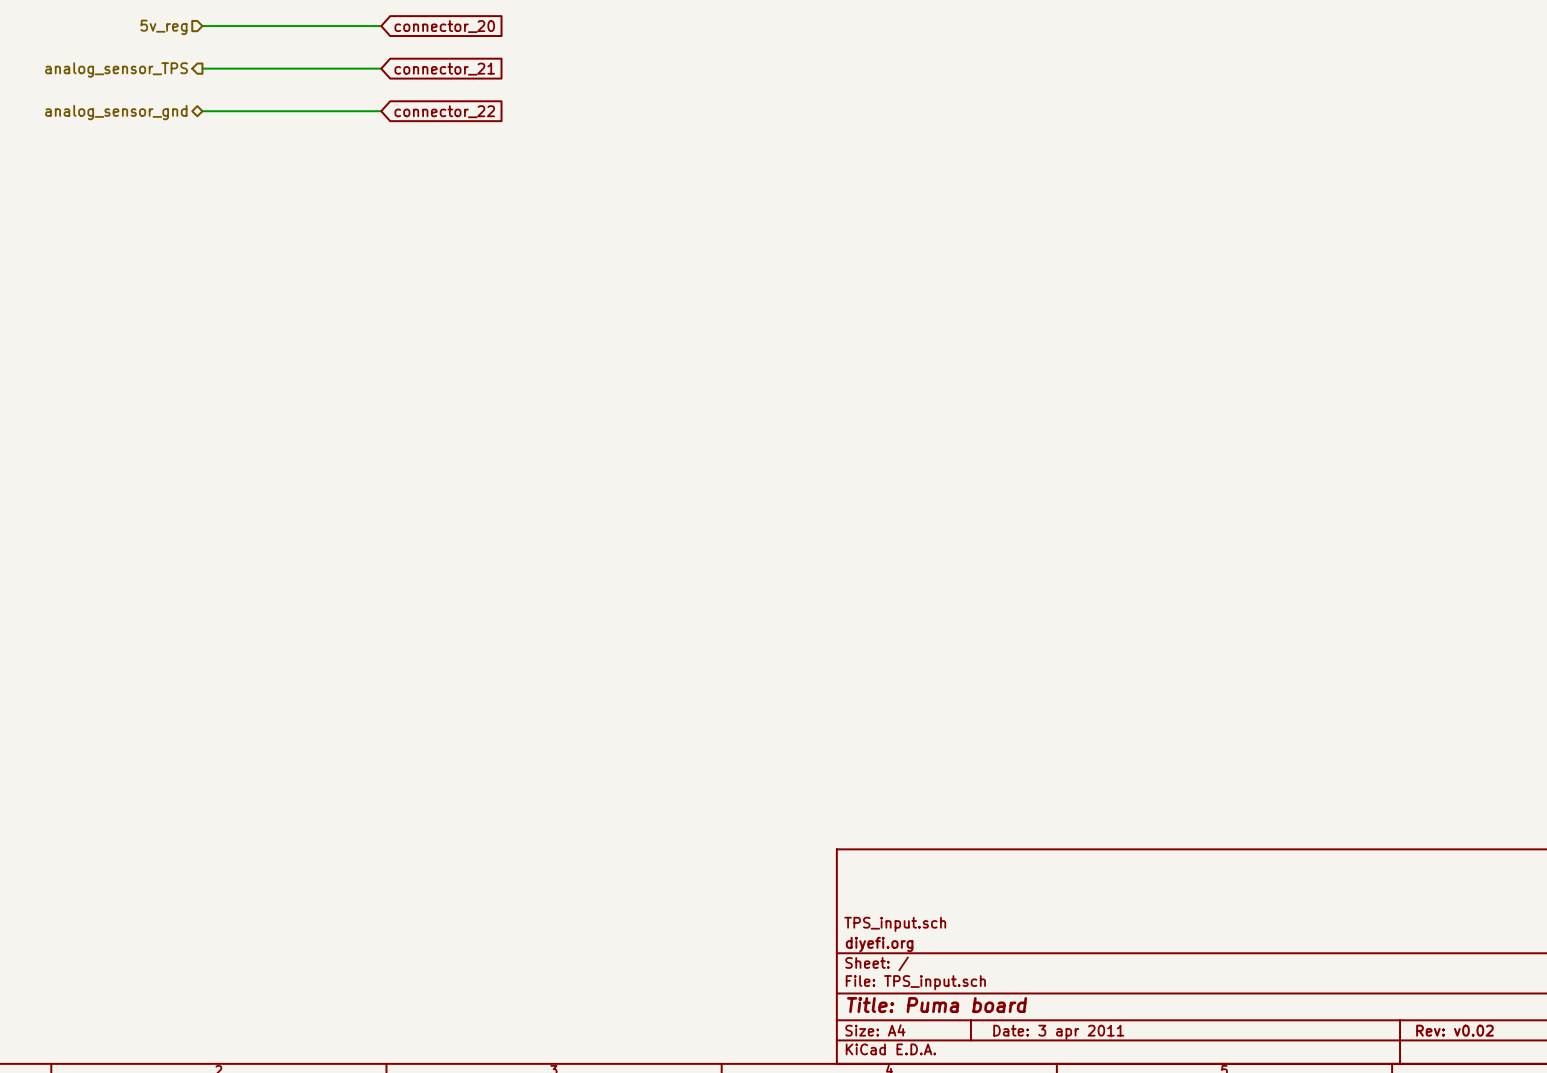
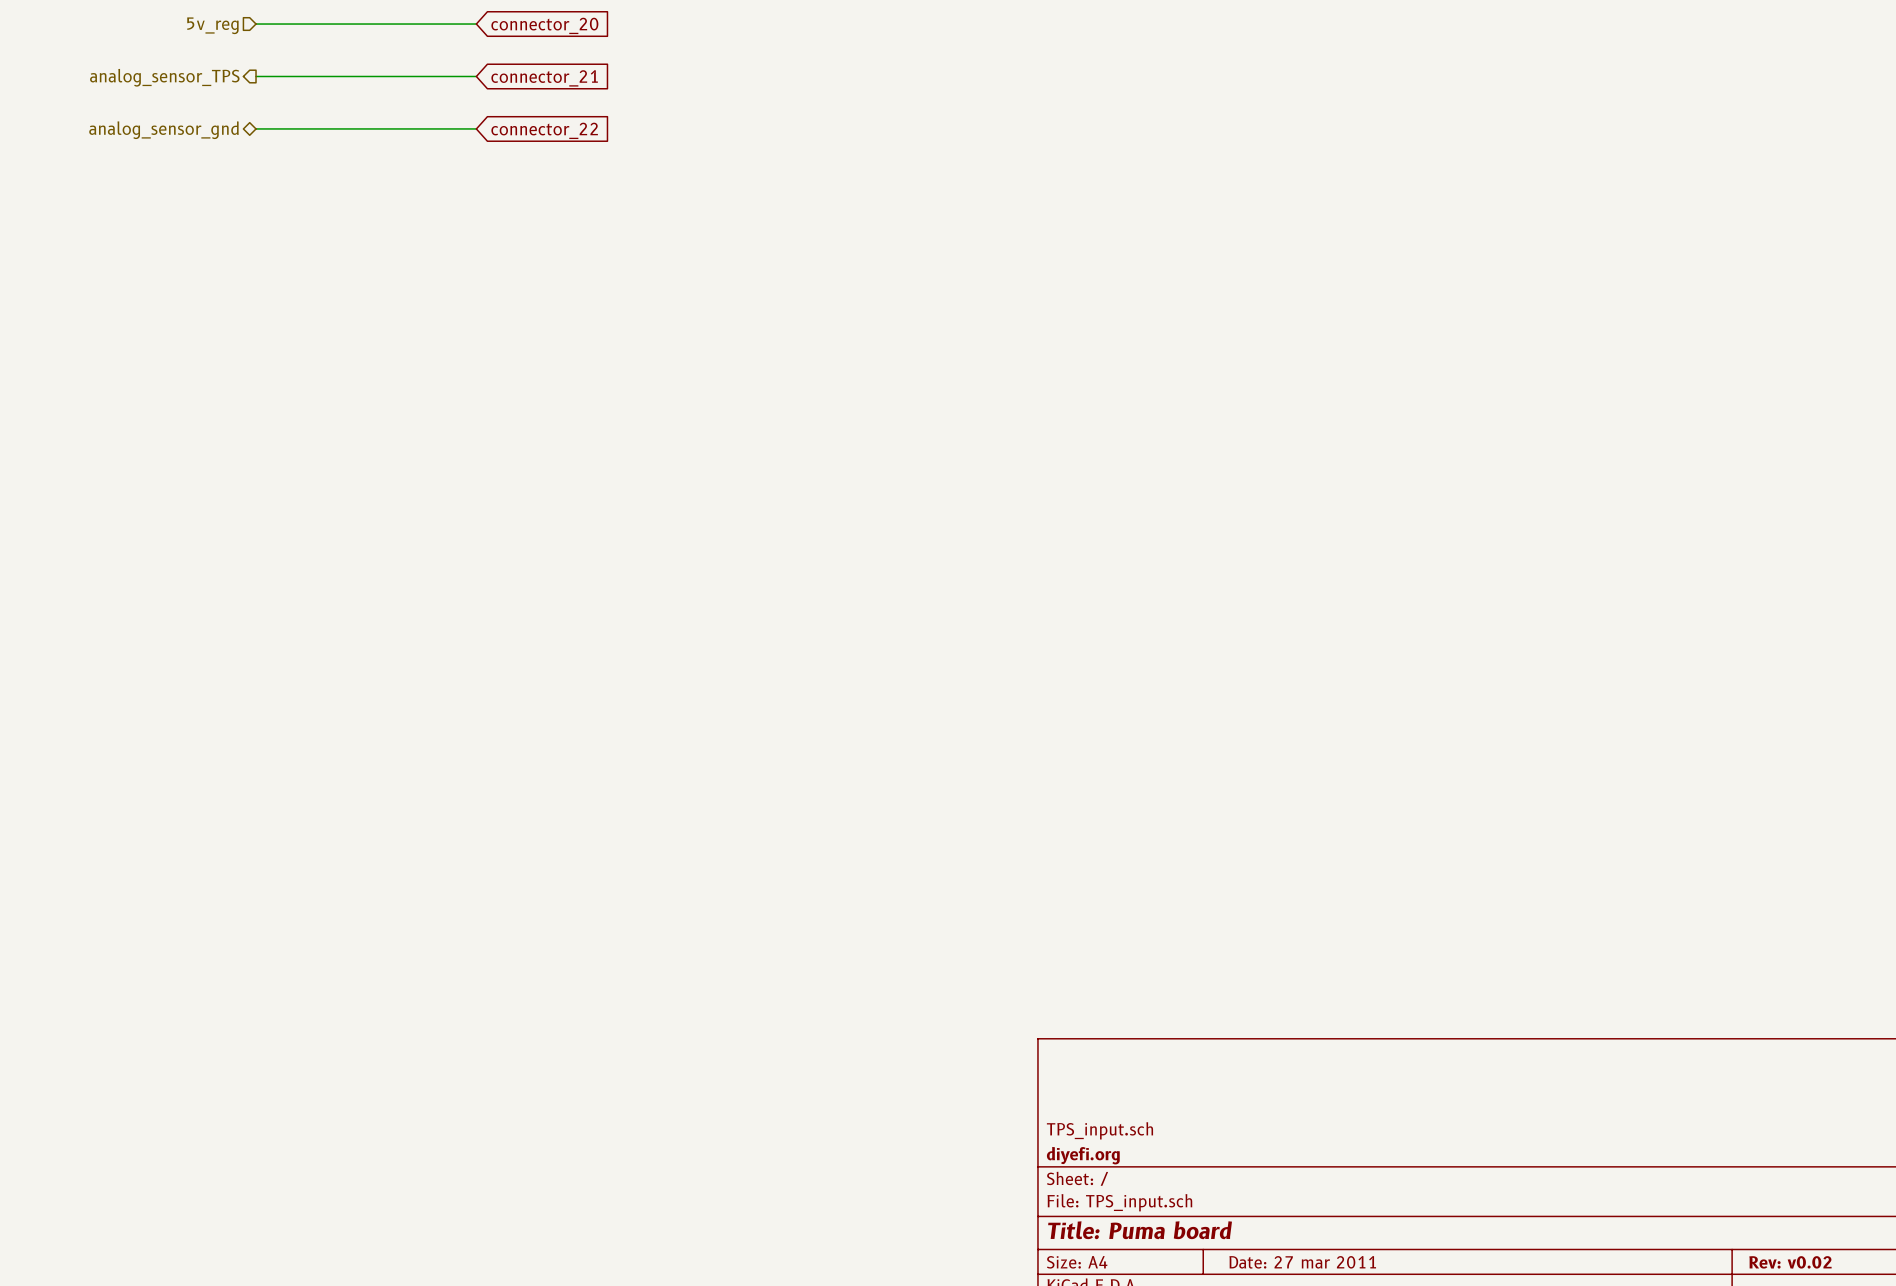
title block: Date: 3 apr 2011 (1058, 1032) -> Date: 27 mar 2011 (1302, 1262)

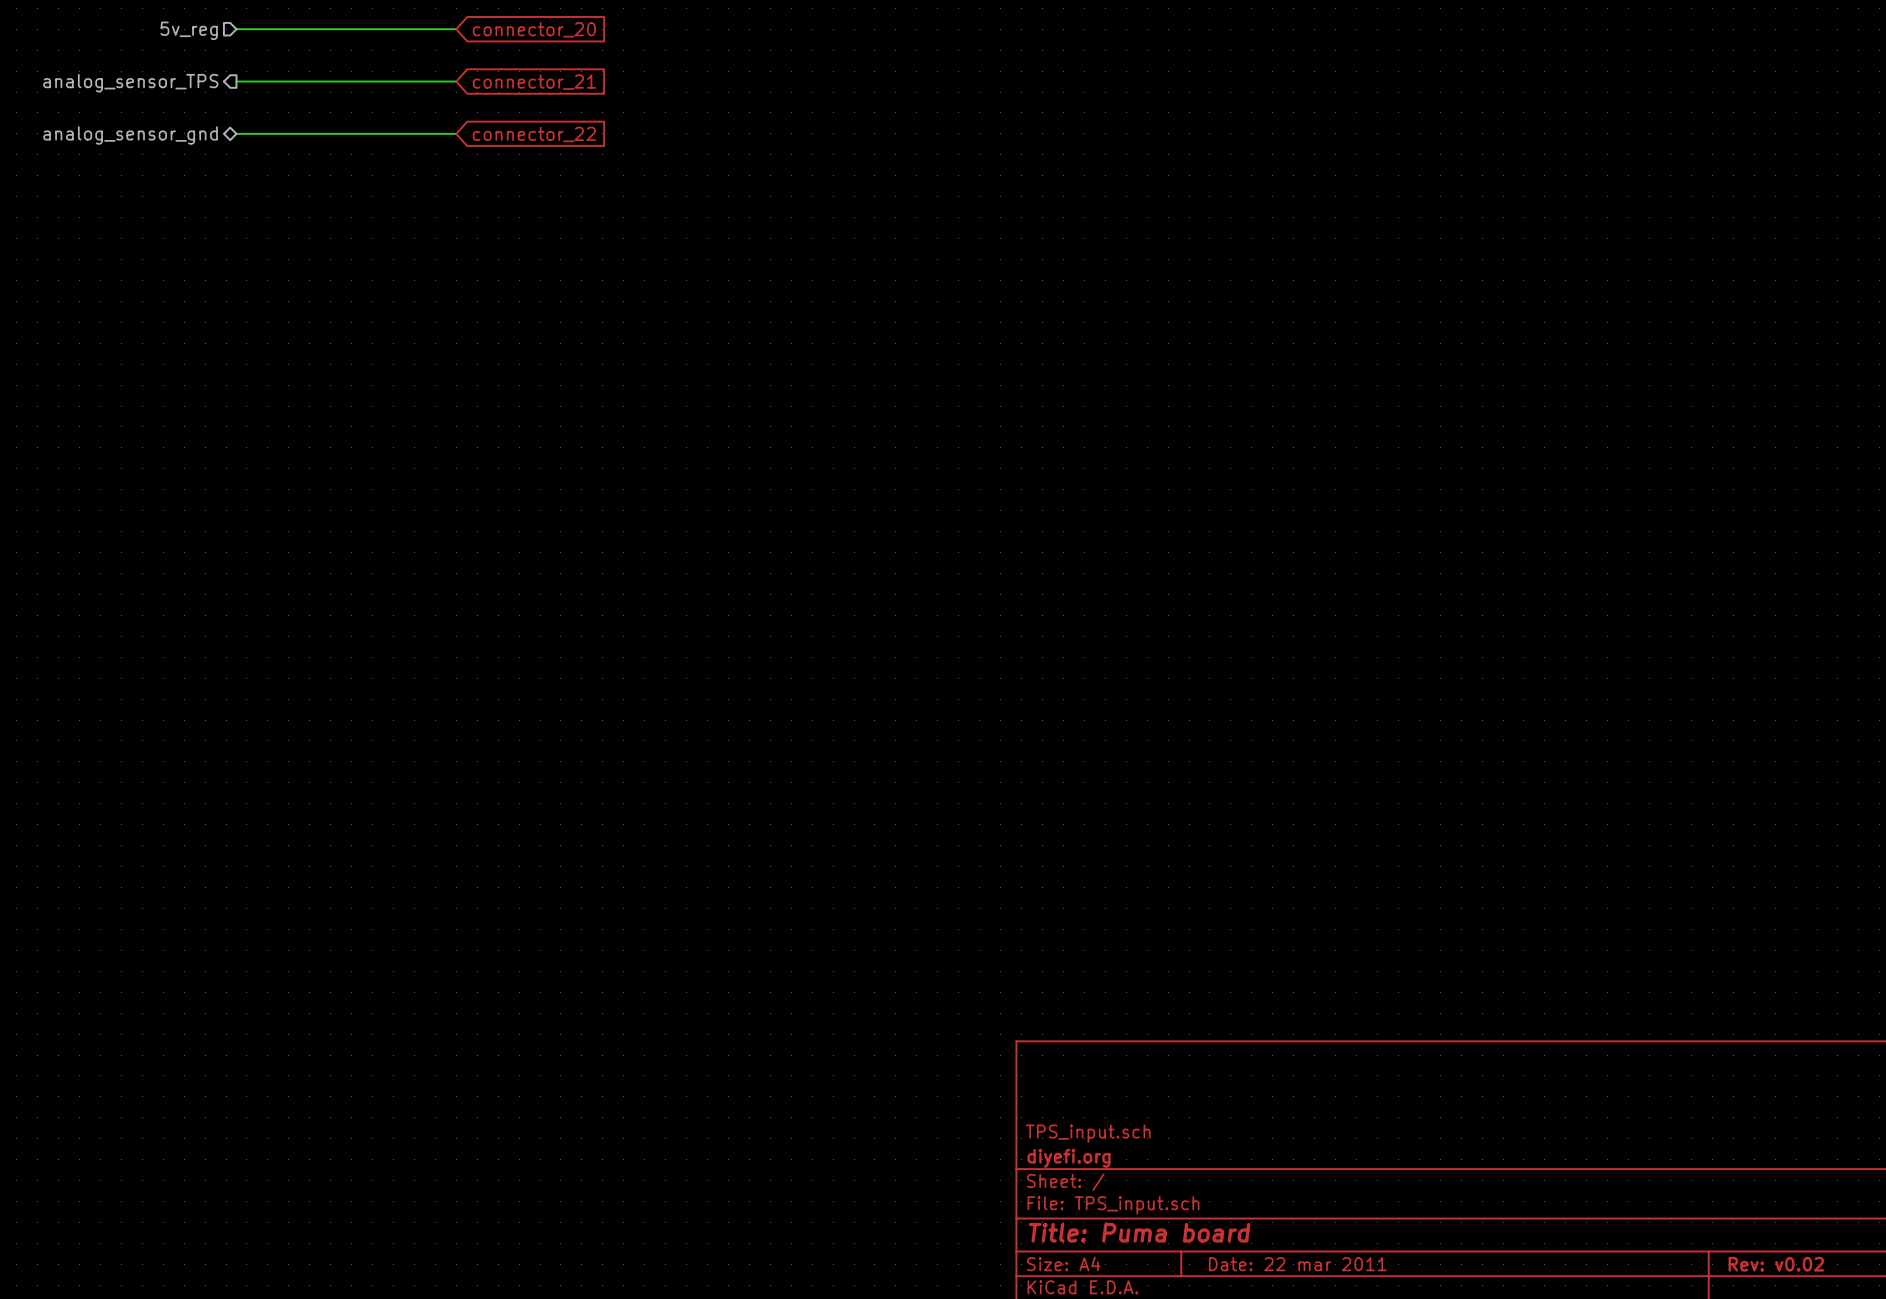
title block: Date: 27 mar 2011 (1302, 1262) -> Date: 22 mar 2011 (1297, 1264)

